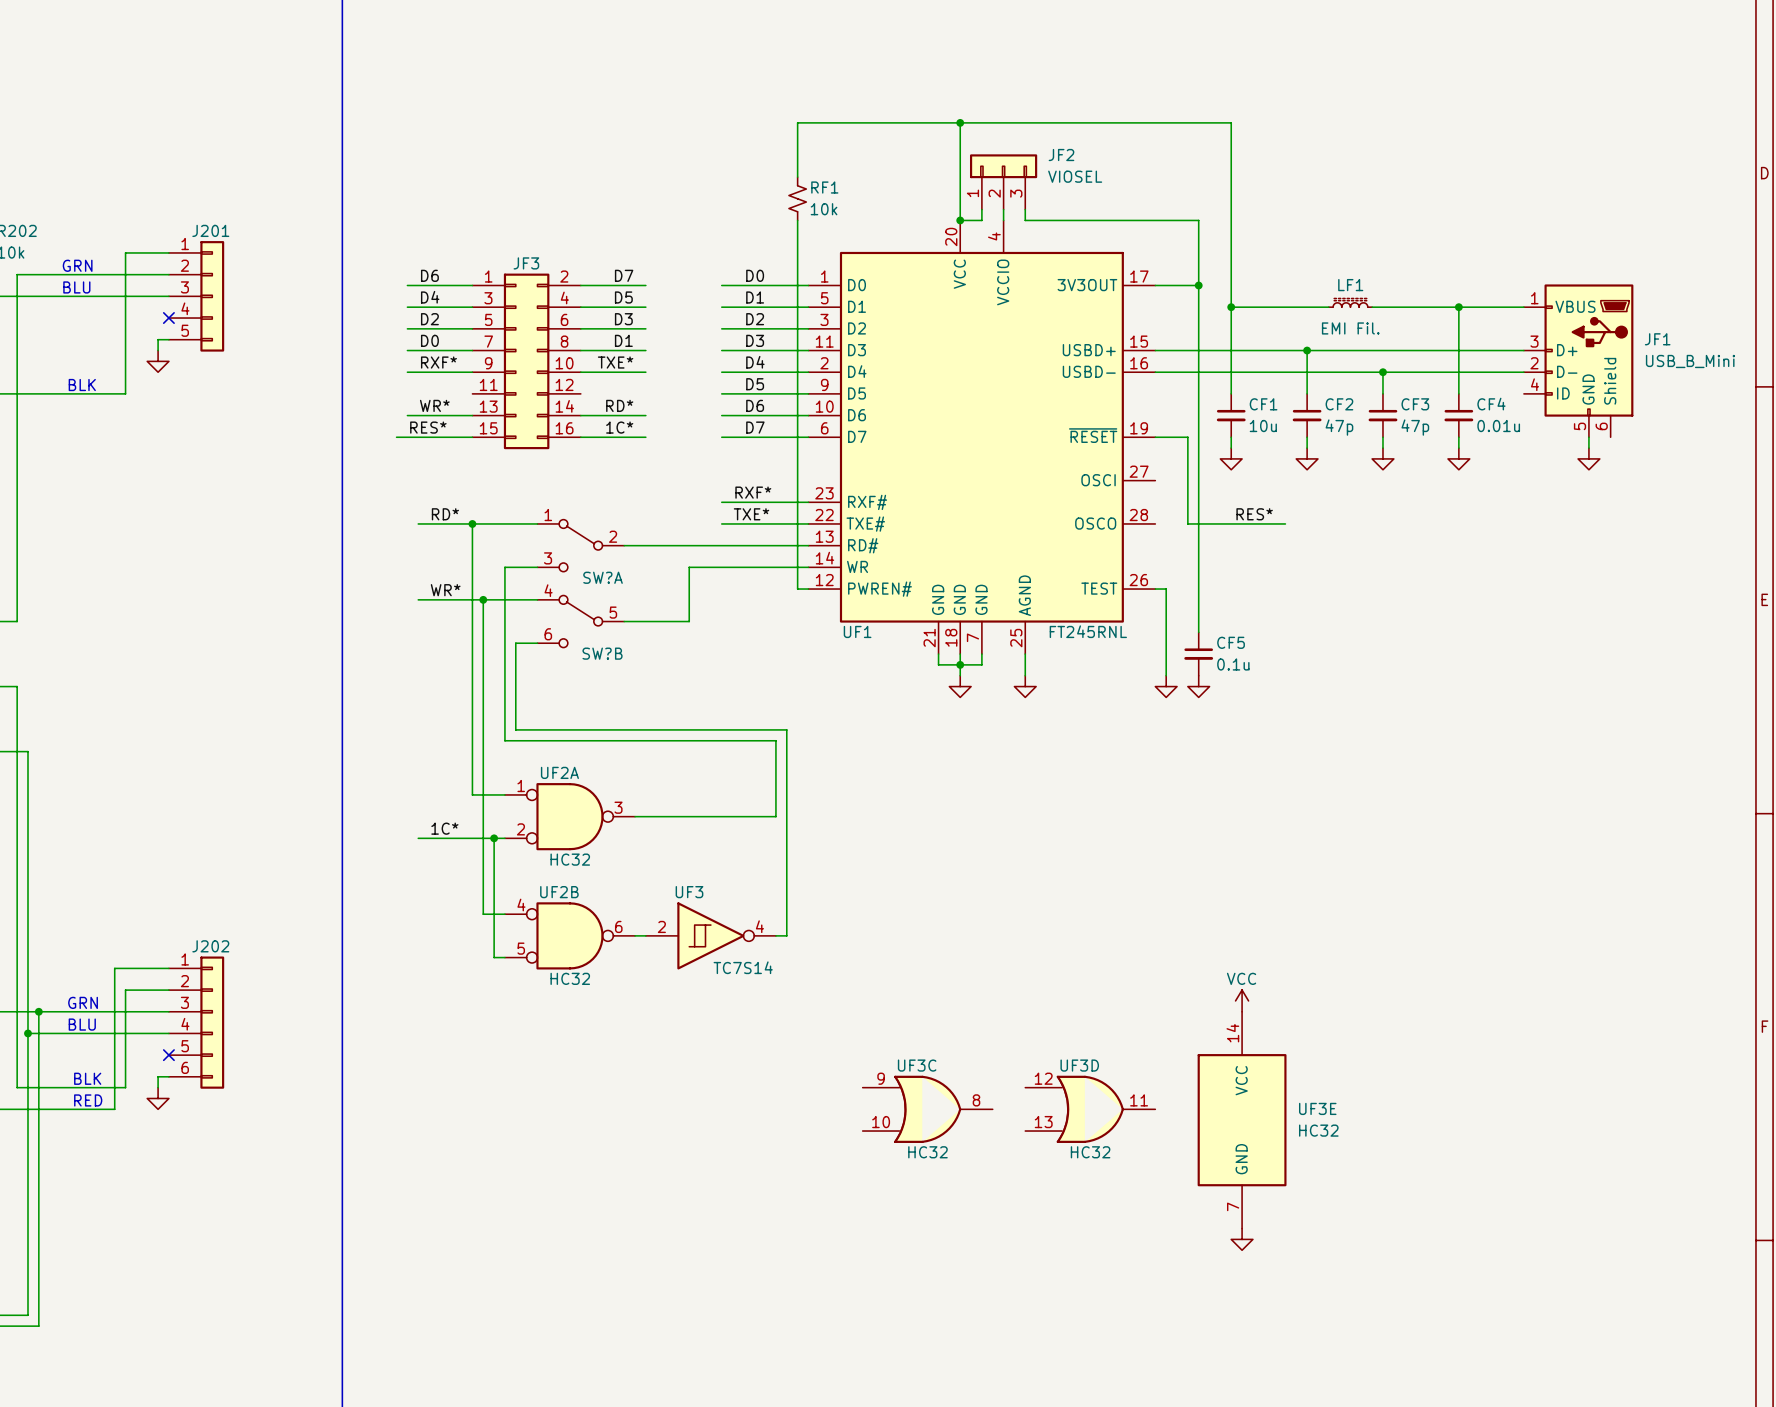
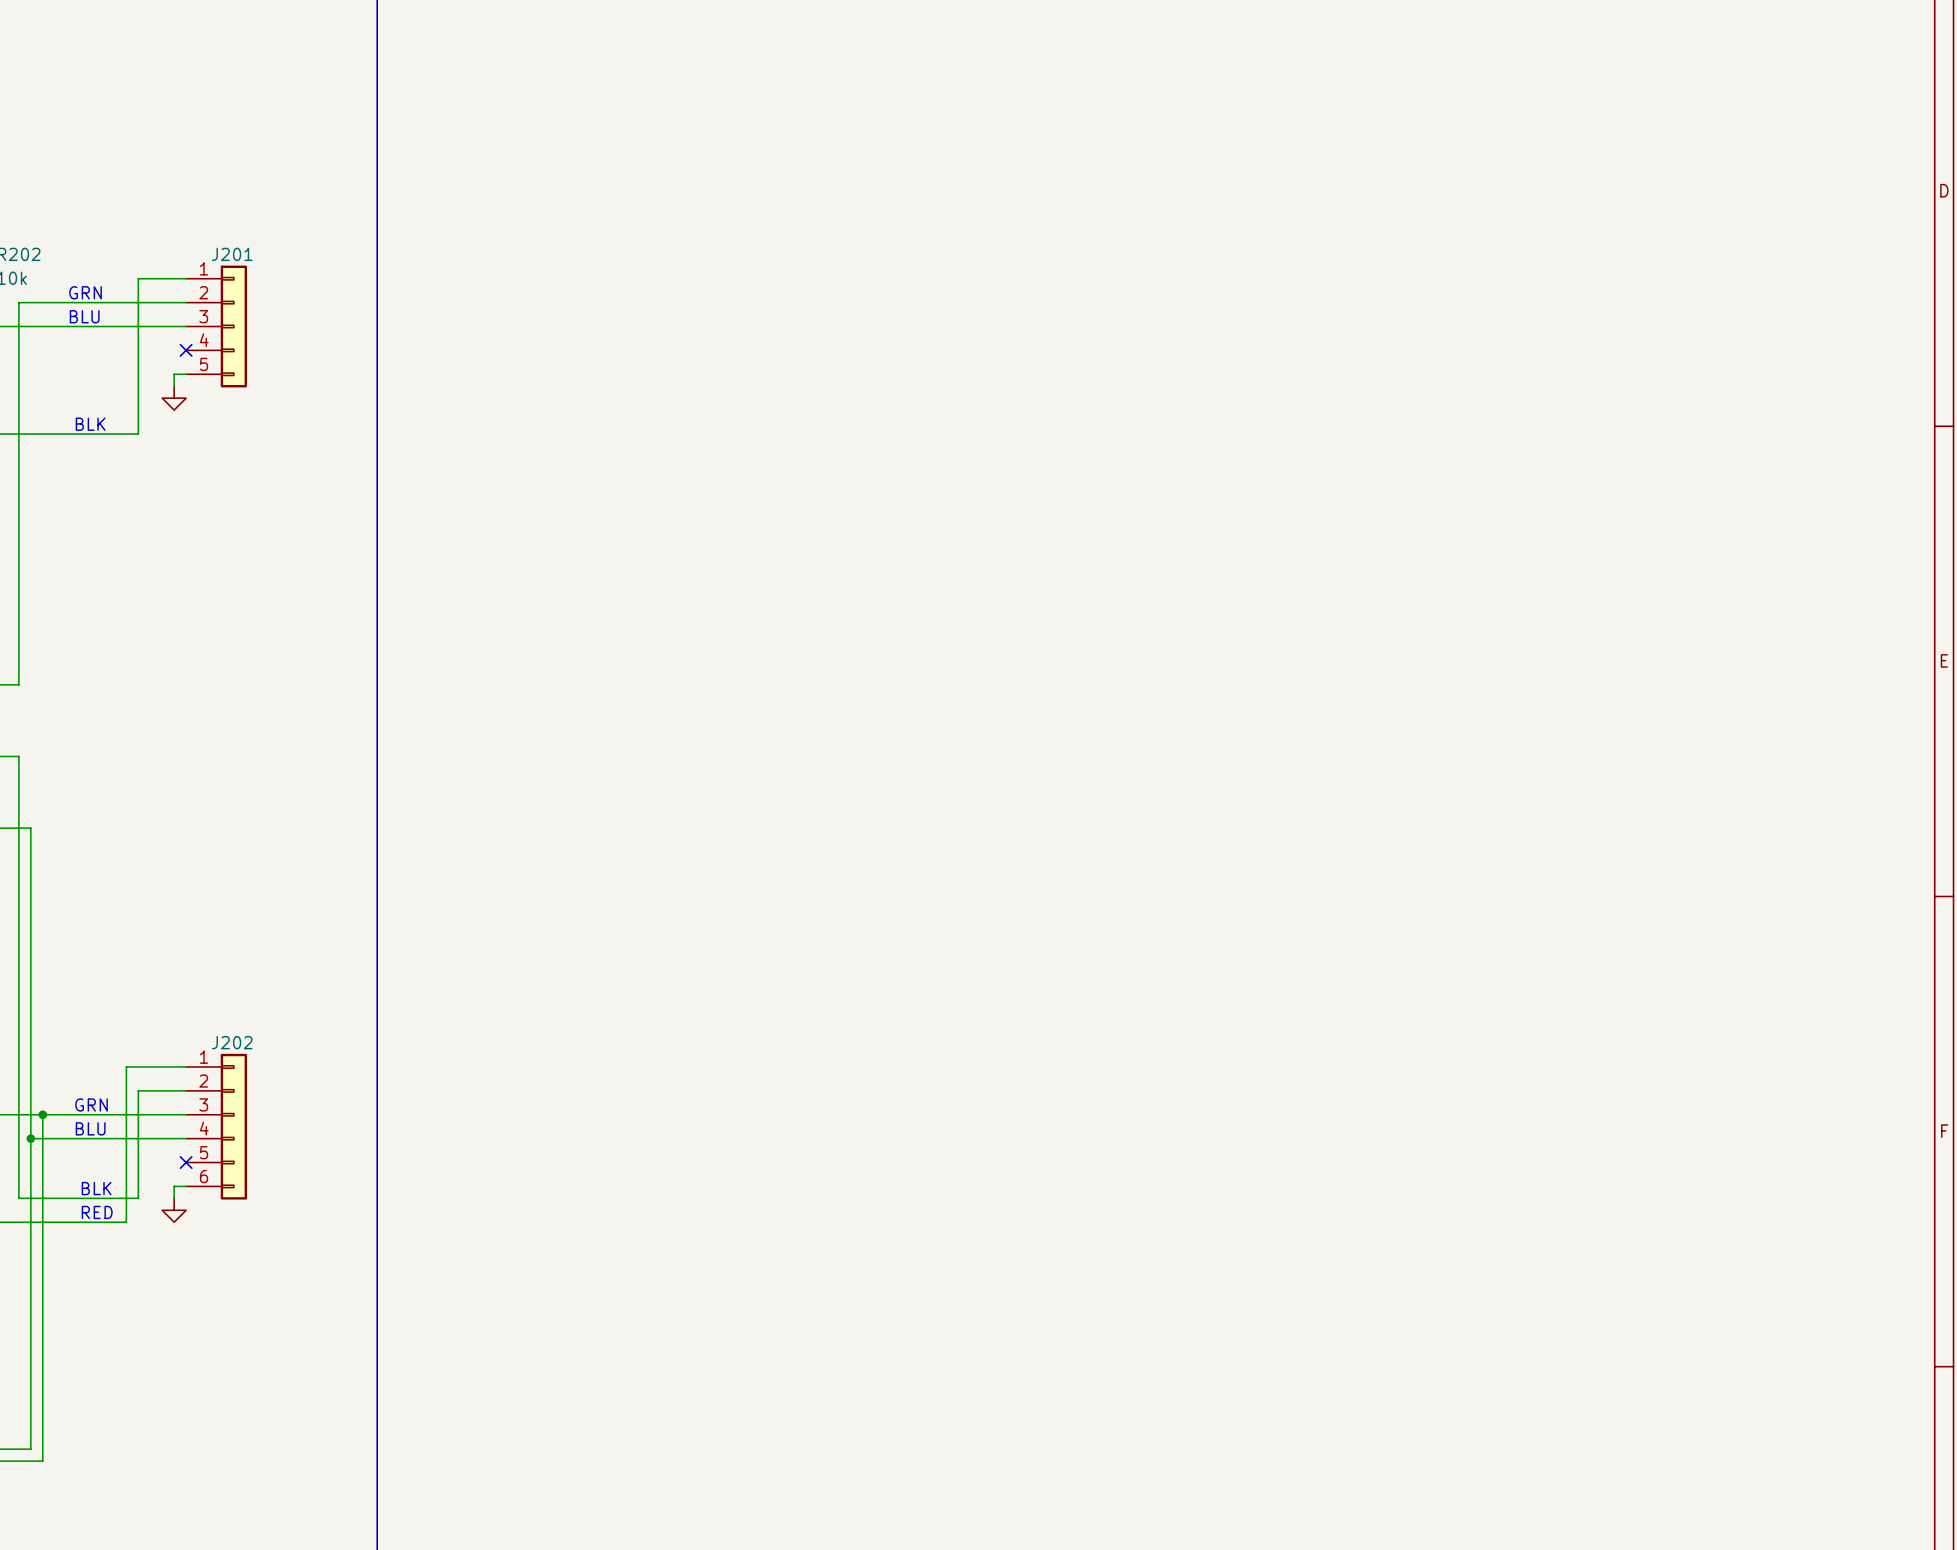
wire: (960, 122) (960, 220) (981, 220) (981, 209) -> none
junction: (960, 122) -> none
wire: (797, 177) (797, 122) (1231, 122) (1231, 393) -> none
JF2: VIOSEL (1003, 181) -> none
RF1: 10k (797, 198) -> none
wire: (1003, 209) (1003, 220) -> none
wire: (1025, 209) (1025, 220) (1198, 220) (1198, 632) -> none
wire: (797, 220) (797, 589) (808, 589) -> none
junction: (960, 220) -> none
label: D6 (429, 275) -> none
label: D7 (624, 275) -> none
label: D0 (755, 275) -> none
wire: (407, 285) (472, 285) -> none
wire: (580, 285) (645, 285) -> none
wire: (721, 285) (808, 285) -> none
wire: (1155, 285) (1198, 285) -> none
junction: (1198, 285) -> none
label: D4 (430, 297) -> none
label: D5 (623, 297) -> none
label: D1 (755, 297) -> none
LF1: EMI Fil. (1350, 302) -> none
wire: (407, 307) (472, 307) -> none
wire: (580, 307) (645, 307) -> none
wire: (721, 307) (808, 307) -> none
wire: (1231, 307) (1328, 307) -> none
junction: (1231, 307) -> none
wire: (1372, 307) (1523, 307) -> none
wire: (1458, 307) (1458, 393) -> none
junction: (1458, 307) -> none
label: D2 (429, 319) -> none
label: D3 (623, 319) -> none
label: D2 (755, 319) -> none
wire: (407, 328) (472, 328) -> none
wire: (580, 328) (645, 328) -> none
wire: (721, 328) (808, 328) -> none
label: D0 (429, 340) -> none
label: D1 (623, 340) -> none
label: D3 (755, 340) -> none
wire: (407, 350) (472, 350) -> none
wire: (580, 350) (645, 350) -> none
wire: (721, 350) (808, 350) -> none
wire: (1155, 350) (1523, 350) -> none
wire: (1307, 350) (1307, 393) -> none
junction: (1307, 350) -> none
JF1: USB_B_Mini (1578, 360) -> none
JF3: (526, 361) -> none
label: RXF* (438, 362) -> none
label: TXE* (615, 362) -> none
label: D4 (755, 362) -> none
wire: (407, 372) (472, 372) -> none
wire: (580, 372) (645, 372) -> none
wire: (721, 372) (808, 372) -> none
wire: (1155, 372) (1523, 372) -> none
wire: (1382, 372) (1382, 393) -> none
junction: (1382, 372) -> none
label: D5 (755, 384) -> none
wire: (721, 393) (808, 393) -> none
label: WR* (434, 405) -> none
label: RD* (619, 405) -> none
label: D6 (755, 405) -> none
wire: (407, 415) (472, 415) -> none
wire: (580, 415) (645, 415) -> none
wire: (721, 415) (808, 415) -> none
CF1: 10u (1231, 415) -> none
CF2: 47p (1307, 415) -> none
CF3: 47p (1382, 415) -> none
CF4: 0.01u (1458, 415) -> none
label: RES* (428, 427) -> none
label: 1C* (619, 427) -> none
label: D7 (755, 427) -> none
wire: (396, 437) (472, 437) -> none
wire: (580, 437) (645, 437) -> none
wire: (721, 437) (808, 437) -> none
UF1: FT245RNL (981, 437) -> none
wire: (1155, 437) (1187, 437) (1187, 523) (1285, 523) -> none
wire: (1231, 437) (1231, 448) -> none
wire: (1307, 437) (1307, 448) -> none
wire: (1382, 437) (1382, 448) -> none
wire: (1458, 437) (1458, 448) -> none
wire: (1588, 437) (1588, 448) -> none
power symbol: (1231, 458) -> none
power symbol: (1307, 458) -> none
power symbol: (1382, 458) -> none
power symbol: (1458, 458) -> none
power symbol: (1588, 458) -> none
label: RXF* (753, 492) -> none
wire: (721, 502) (808, 502) -> none
label: RD* (445, 514) -> none
label: TXE* (751, 514) -> none
label: RES* (1254, 514) -> none
wire: (418, 523) (537, 523) -> none
wire: (472, 523) (472, 794) (504, 794) -> none
junction: (472, 523) -> none
wire: (721, 523) (808, 523) -> none
SW?A: (580, 545) -> none
wire: (624, 545) (808, 545) -> none
wire: (537, 567) (504, 567) (504, 740) (775, 740) (775, 816) (635, 816) -> none
wire: (808, 567) (689, 567) (689, 621) (624, 621) -> none
wire: (1155, 589) (1166, 589) (1166, 675) -> none
label: WR* (445, 590) -> none
wire: (418, 599) (537, 599) -> none
wire: (483, 599) (483, 914) (504, 914) -> none
junction: (483, 599) -> none
SW?B: (580, 621) -> none
wire: (537, 643) (515, 643) (515, 729) (786, 729) (786, 935) (775, 935) -> none
wire: (938, 654) (938, 664) (981, 664) (981, 654) -> none
wire: (960, 654) (960, 675) -> none
wire: (1025, 654) (1025, 675) -> none
CF5: 0.1u (1198, 654) -> none
junction: (960, 664) -> none
power symbol: (960, 686) -> none
power symbol: (1025, 686) -> none
power symbol: (1166, 686) -> none
power symbol: (1198, 686) -> none
UF2A: HC32 (569, 816) -> none
label: 1C* (444, 828) -> none
wire: (418, 838) (504, 838) -> none
wire: (494, 838) (494, 957) (504, 957) -> none
junction: (494, 838) -> none
UF2B: HC32 (569, 935) -> none
wire: (635, 935) (645, 935) -> none
UF3: TC7S14 (710, 935) -> none
power symbol: VCC (1242, 1000) -> none
UF3C: HC32 (927, 1109) -> none
UF3D: HC32 (1090, 1109) -> none
UF3E: HC32 (1242, 1120) -> none
power symbol: (1242, 1239) -> none

